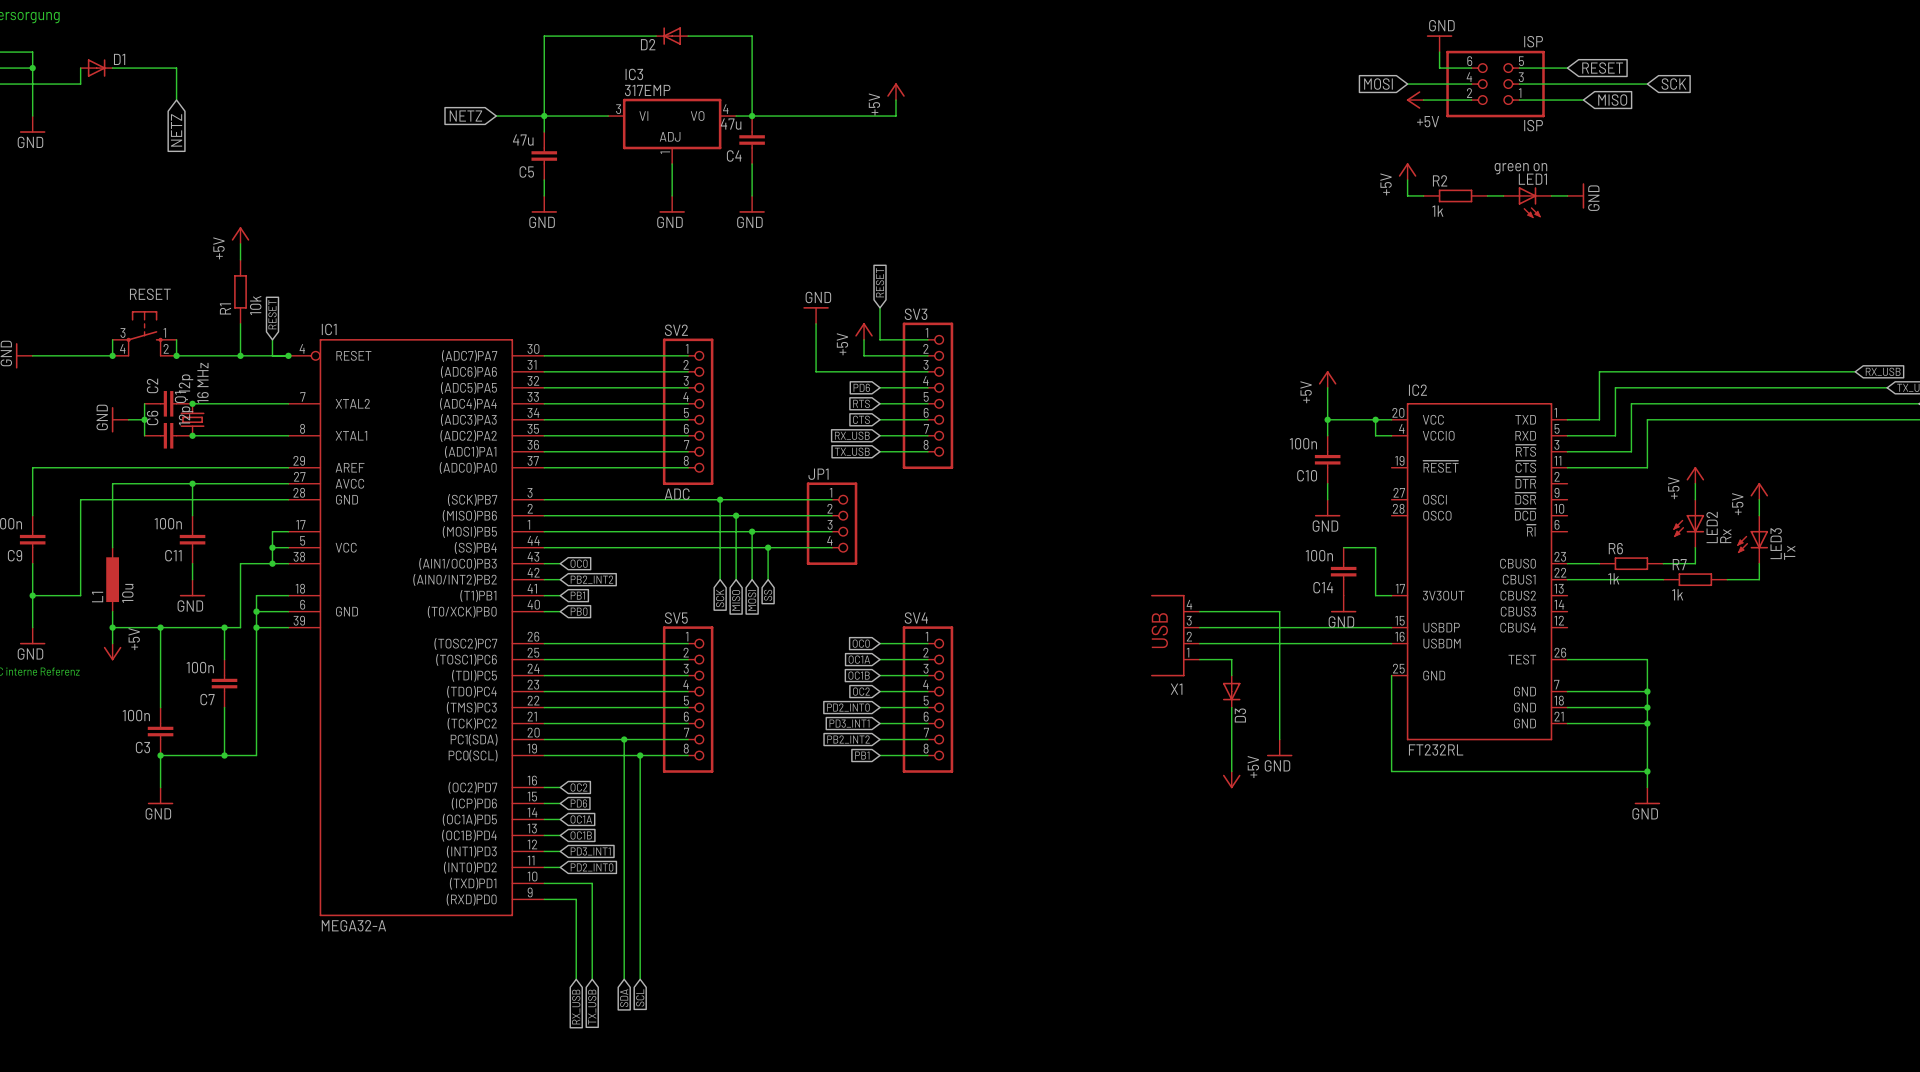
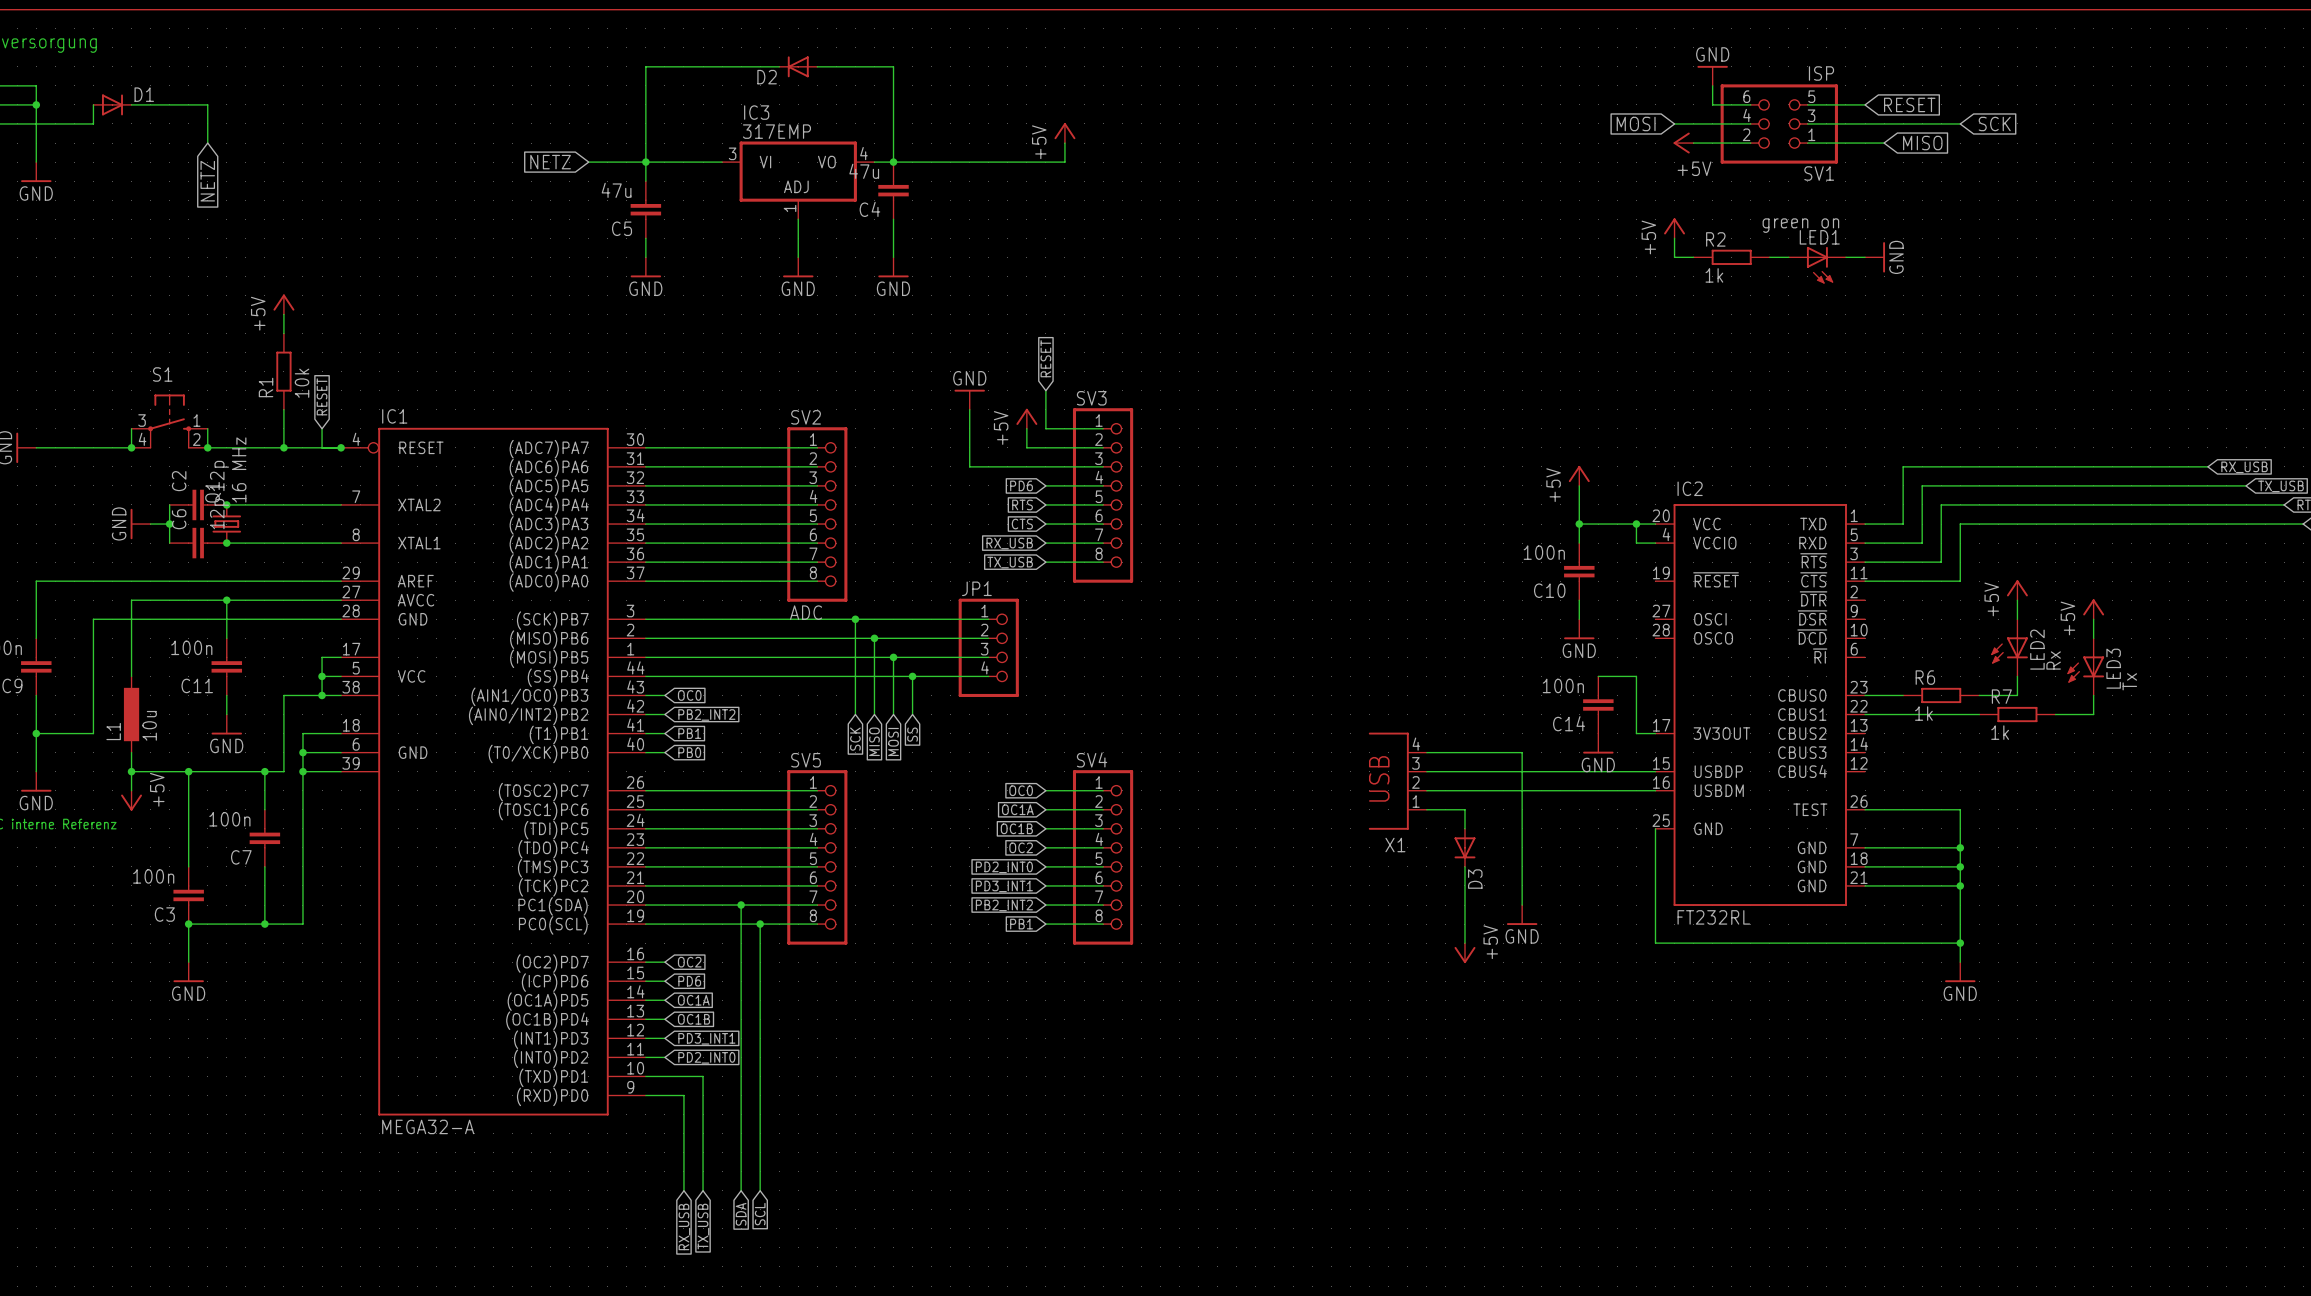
ISP name: ISP (1533, 125) -> SV1 (1819, 173)
RESET name: RESET (150, 294) -> S1 (162, 374)

